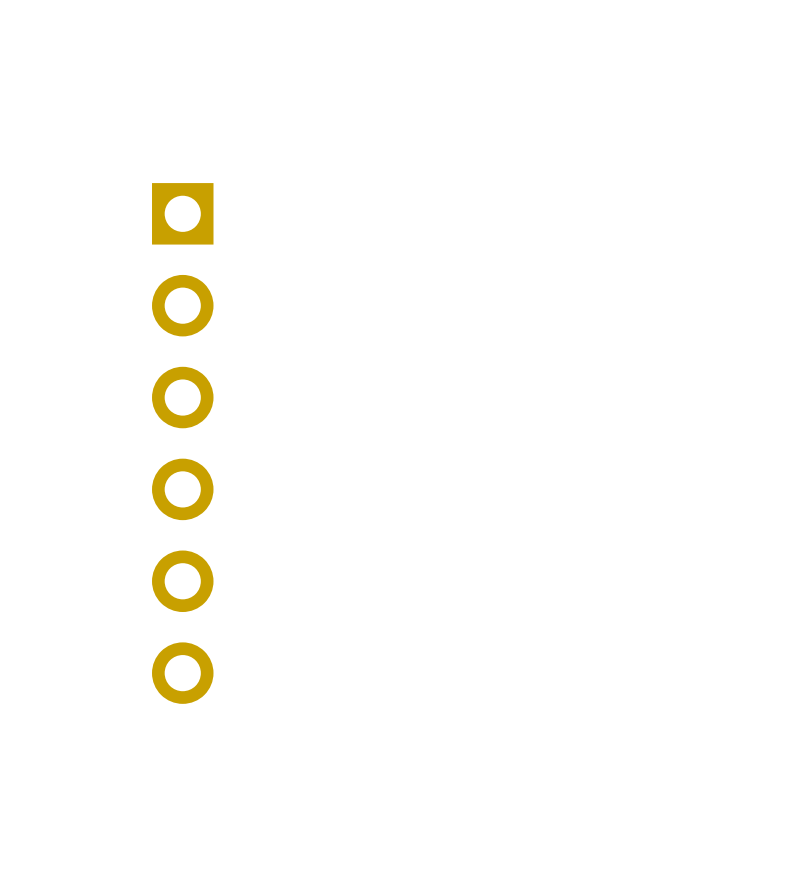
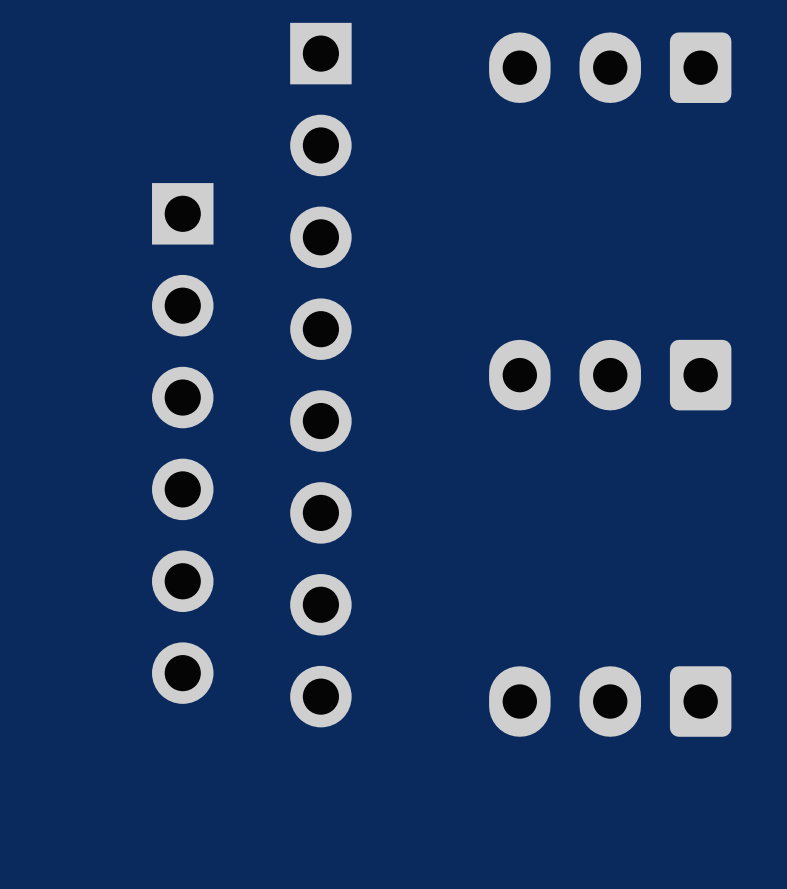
part: none -> (610, 67)
part: none -> (320, 375)
part: none -> (610, 375)
part: none -> (610, 701)

